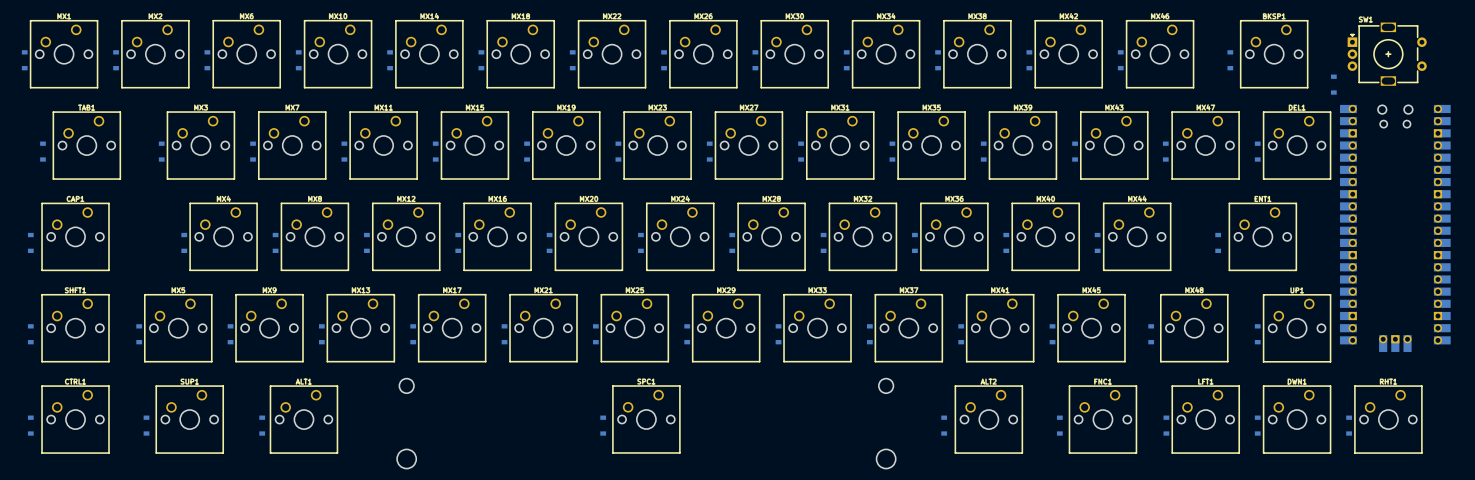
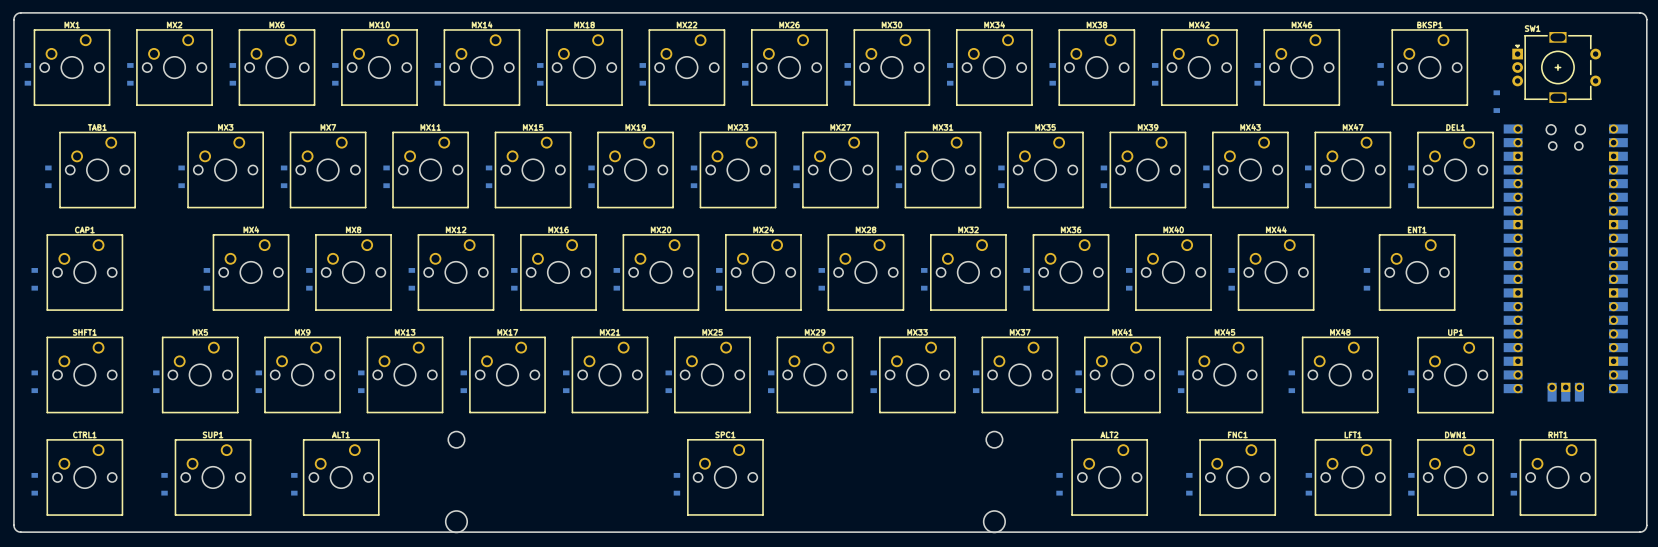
board edge: none -> (20, 12) (1642, 13) (1646, 19) (1646, 527) (1639, 532) (18, 531) (13, 525) (13, 19) (15, 14) (20, 12)

